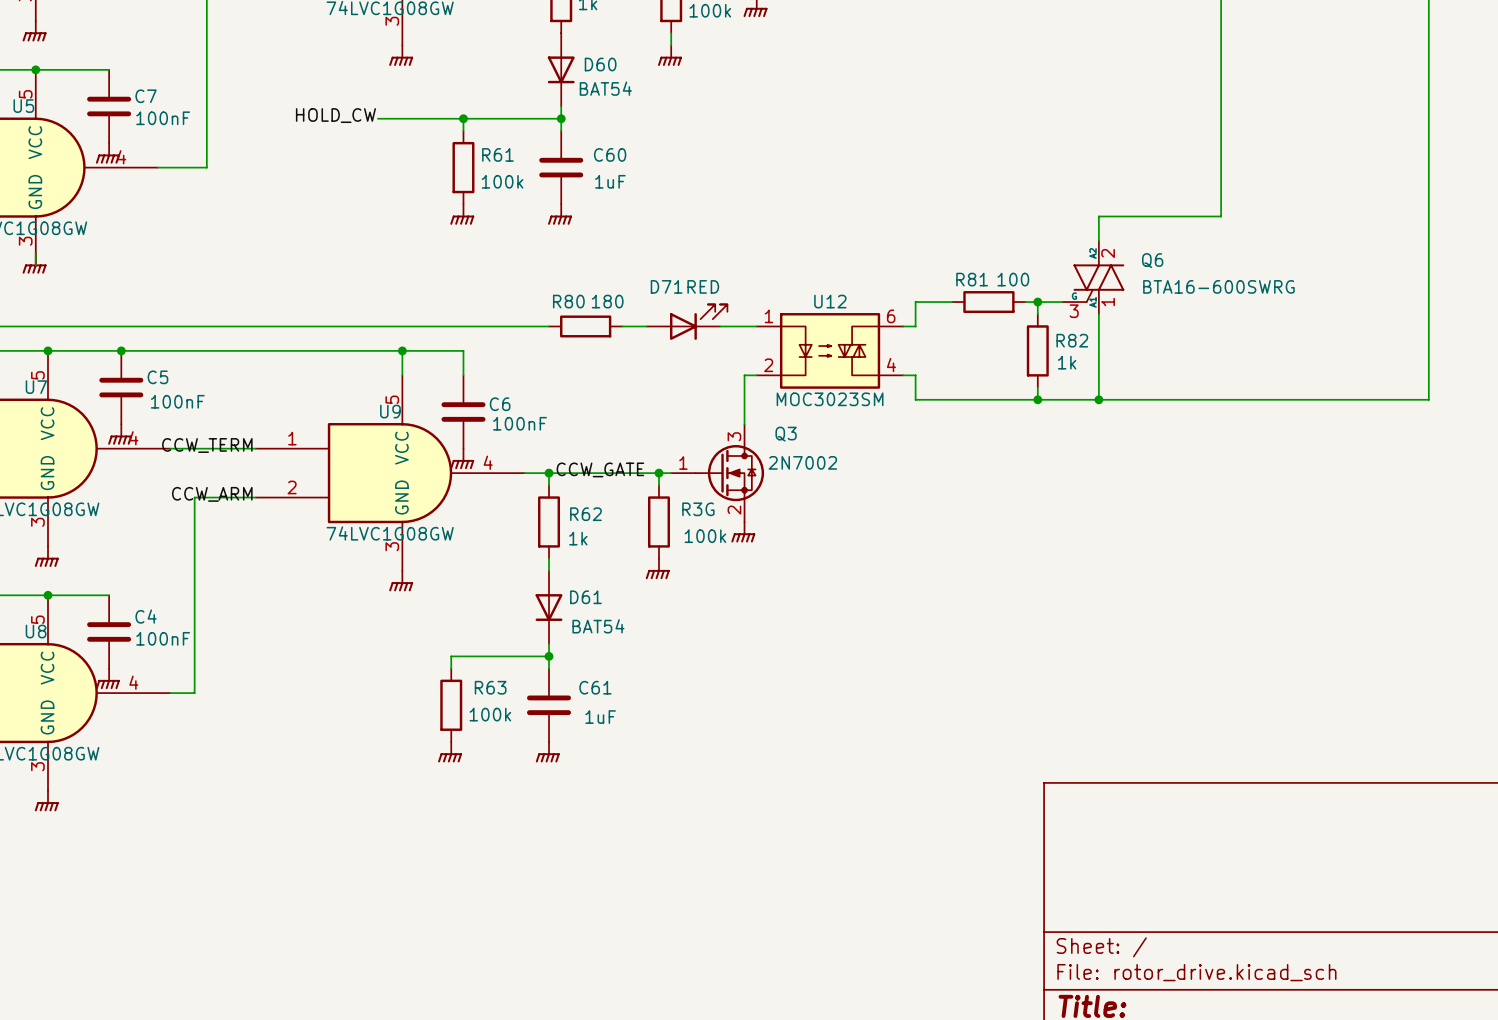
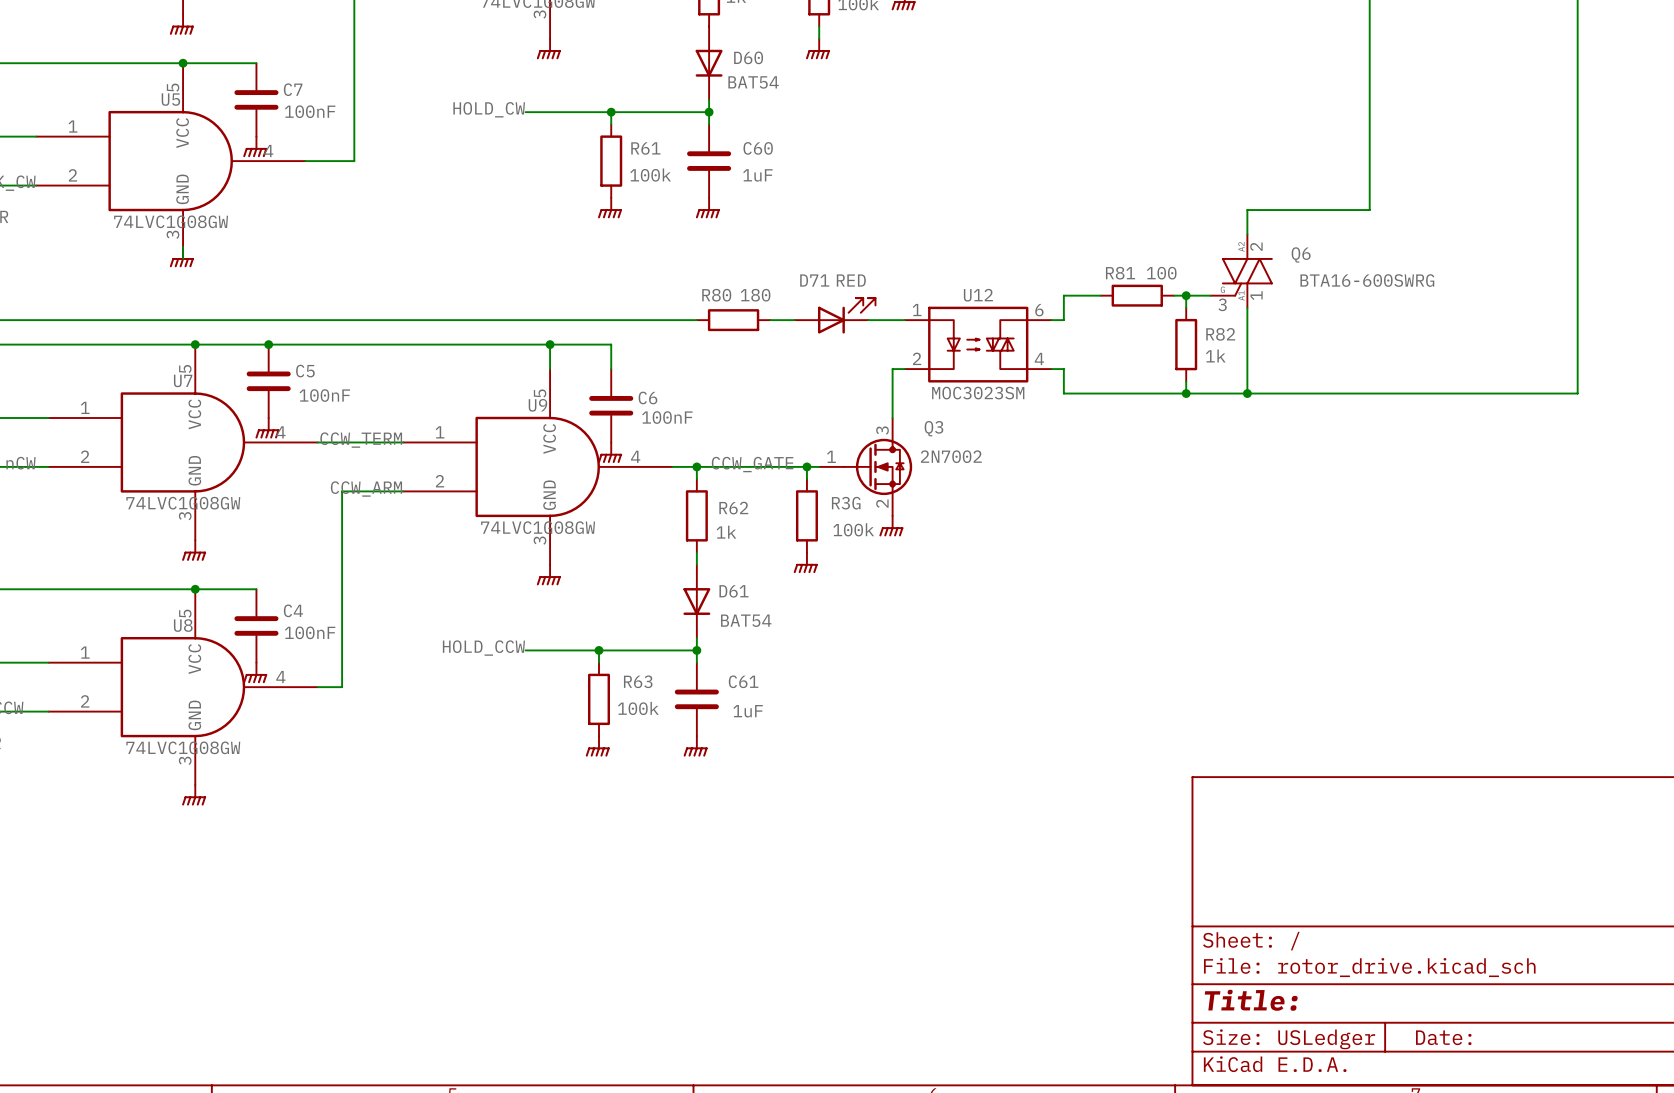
label: none -> HOLD_CCW (483, 648)
wire: none -> (525, 650) (598, 650)
junction: none -> (598, 650)

